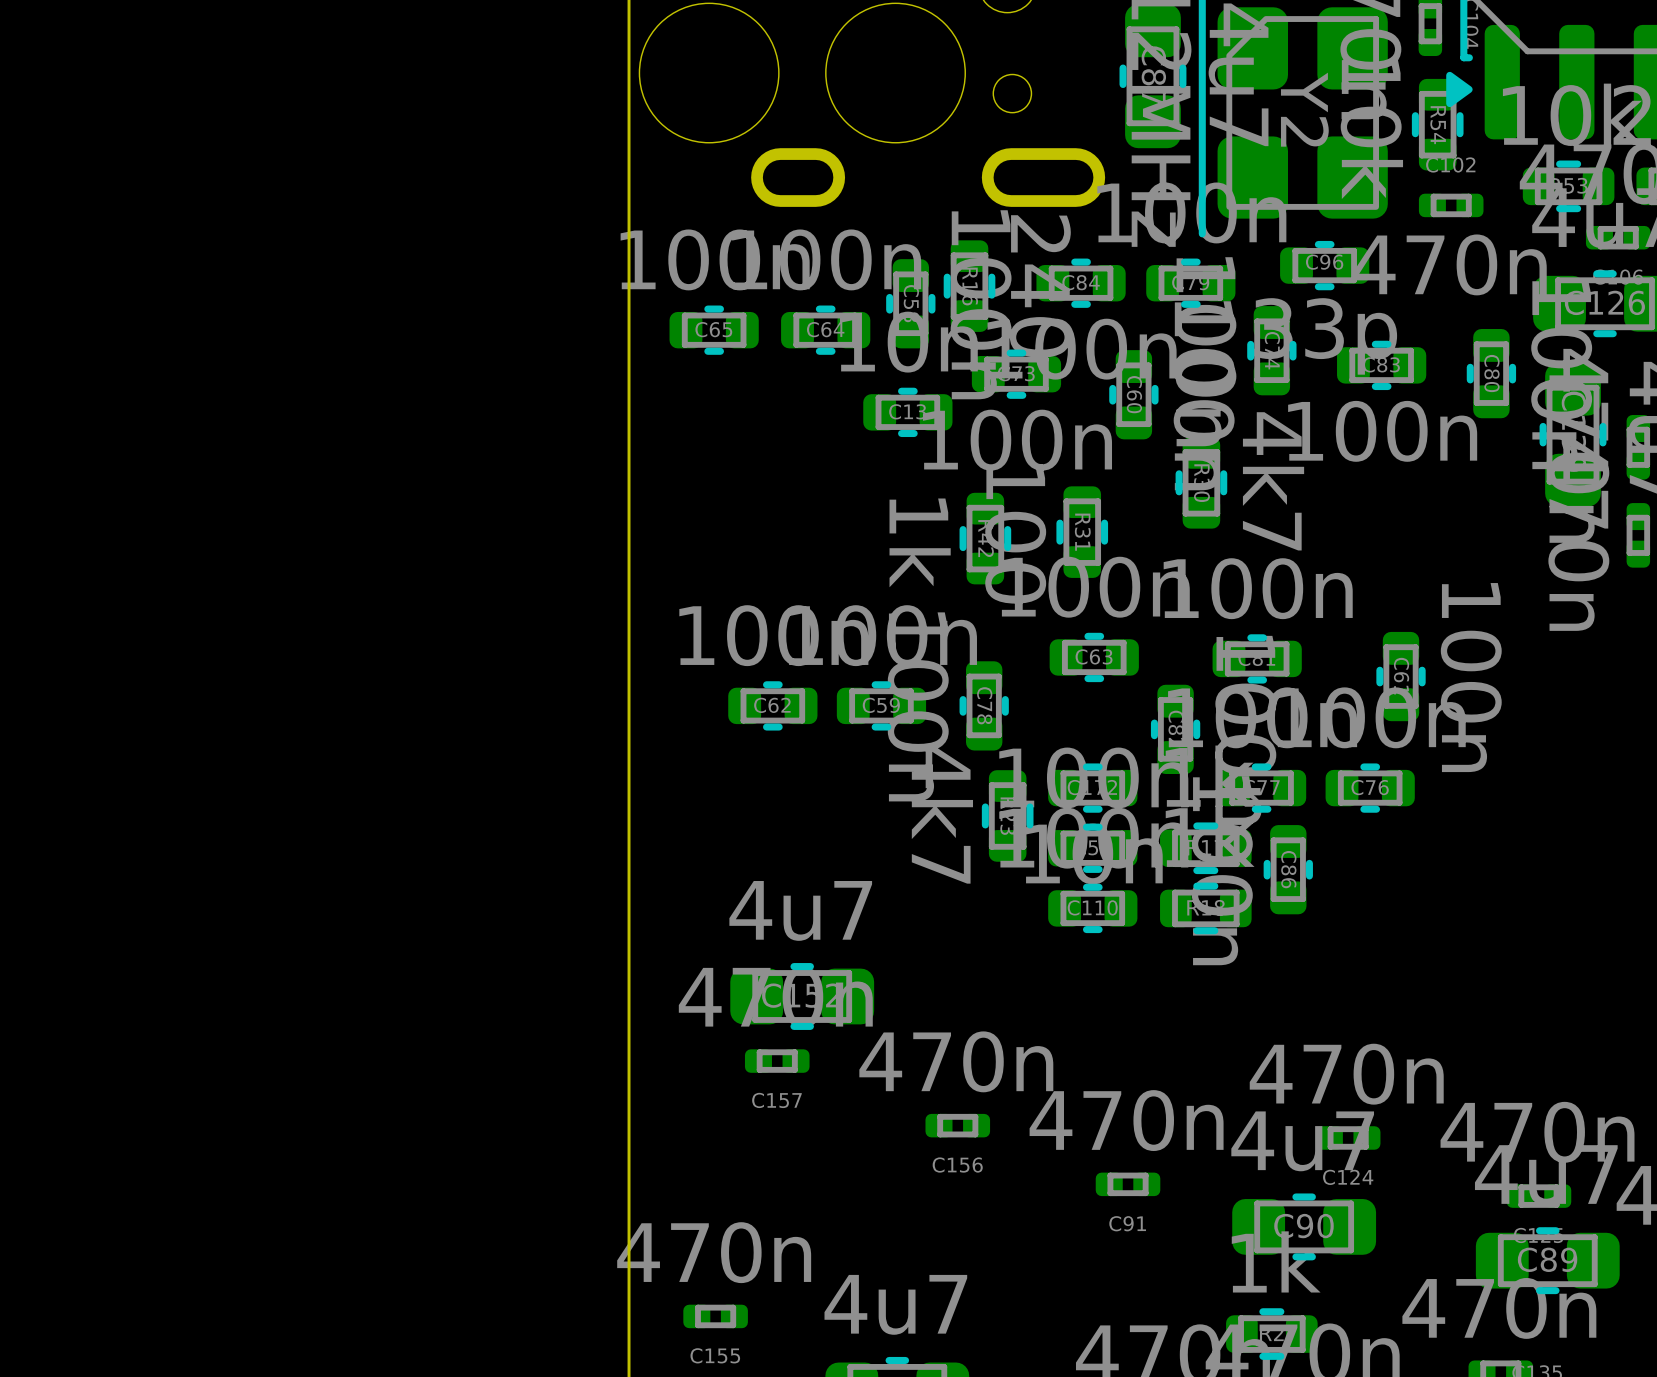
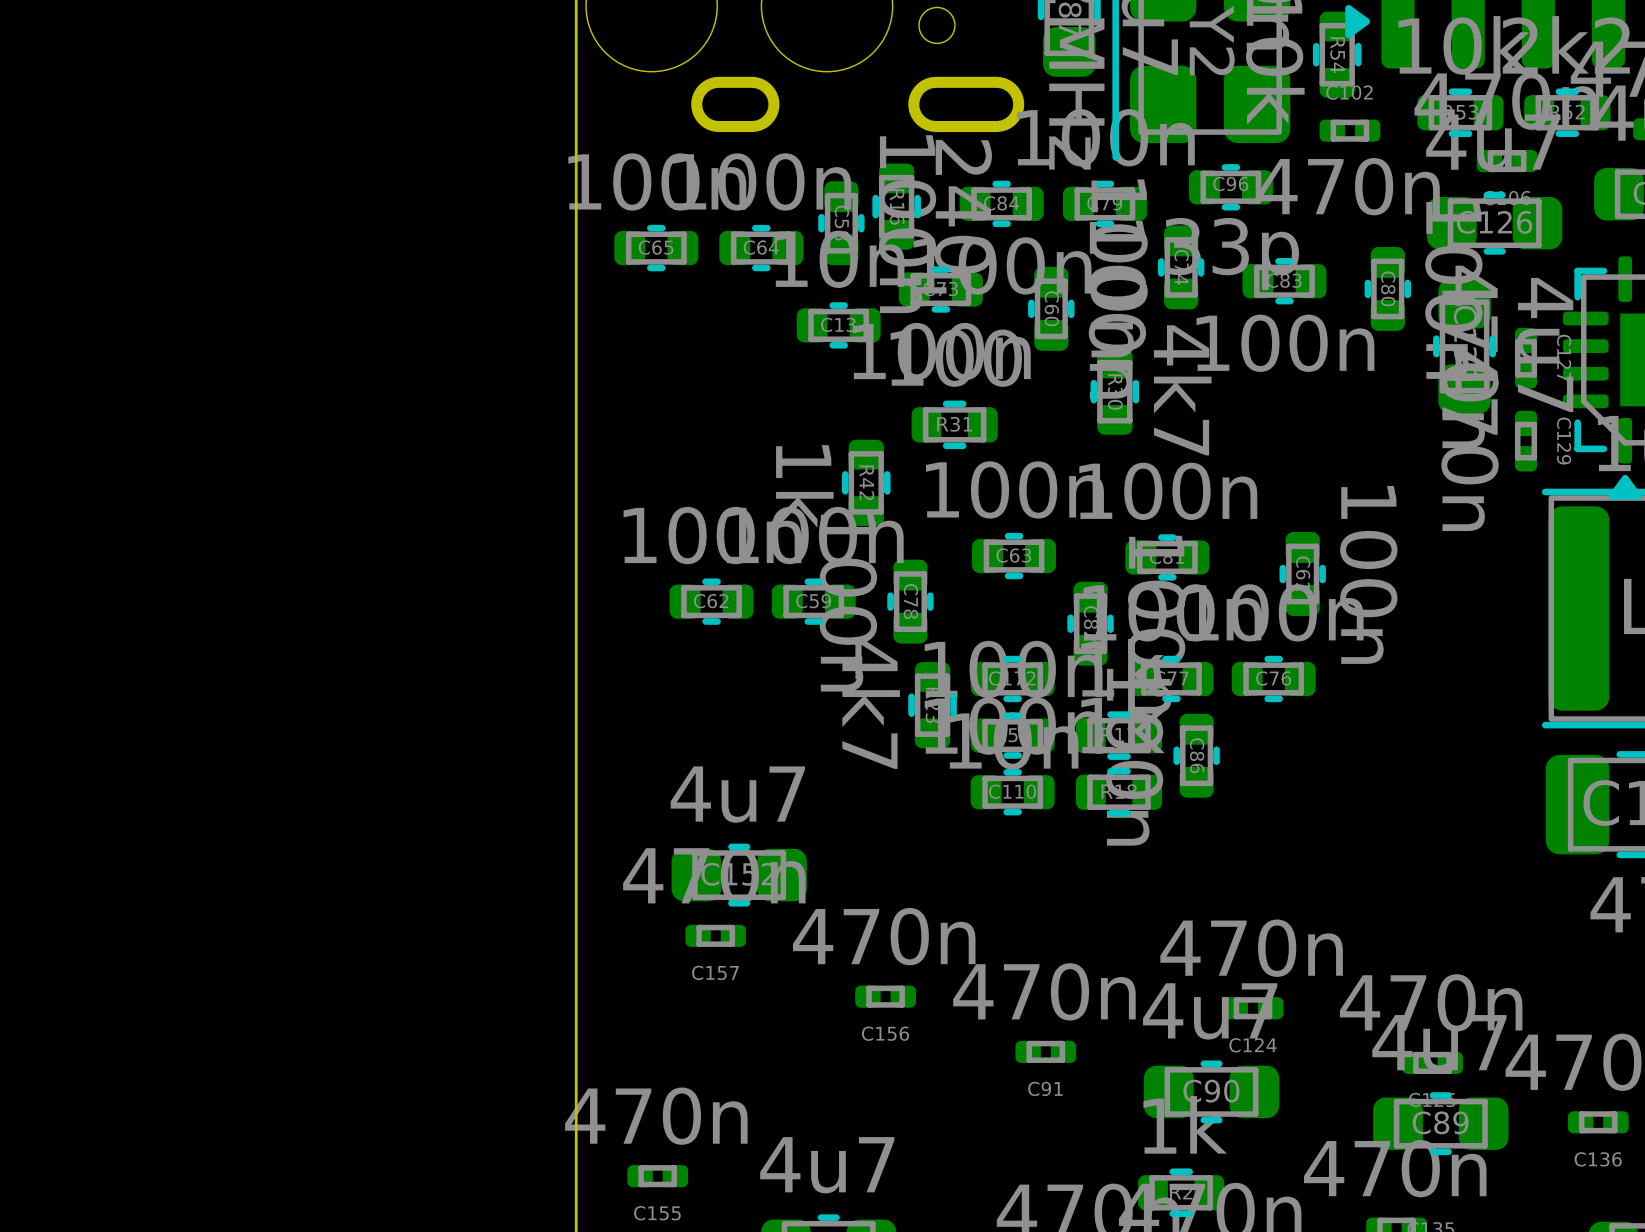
R31 rotation: 0° (1082, 532) -> 90° clockwise (954, 424)
R42 position: (985, 538) -> (866, 482)

